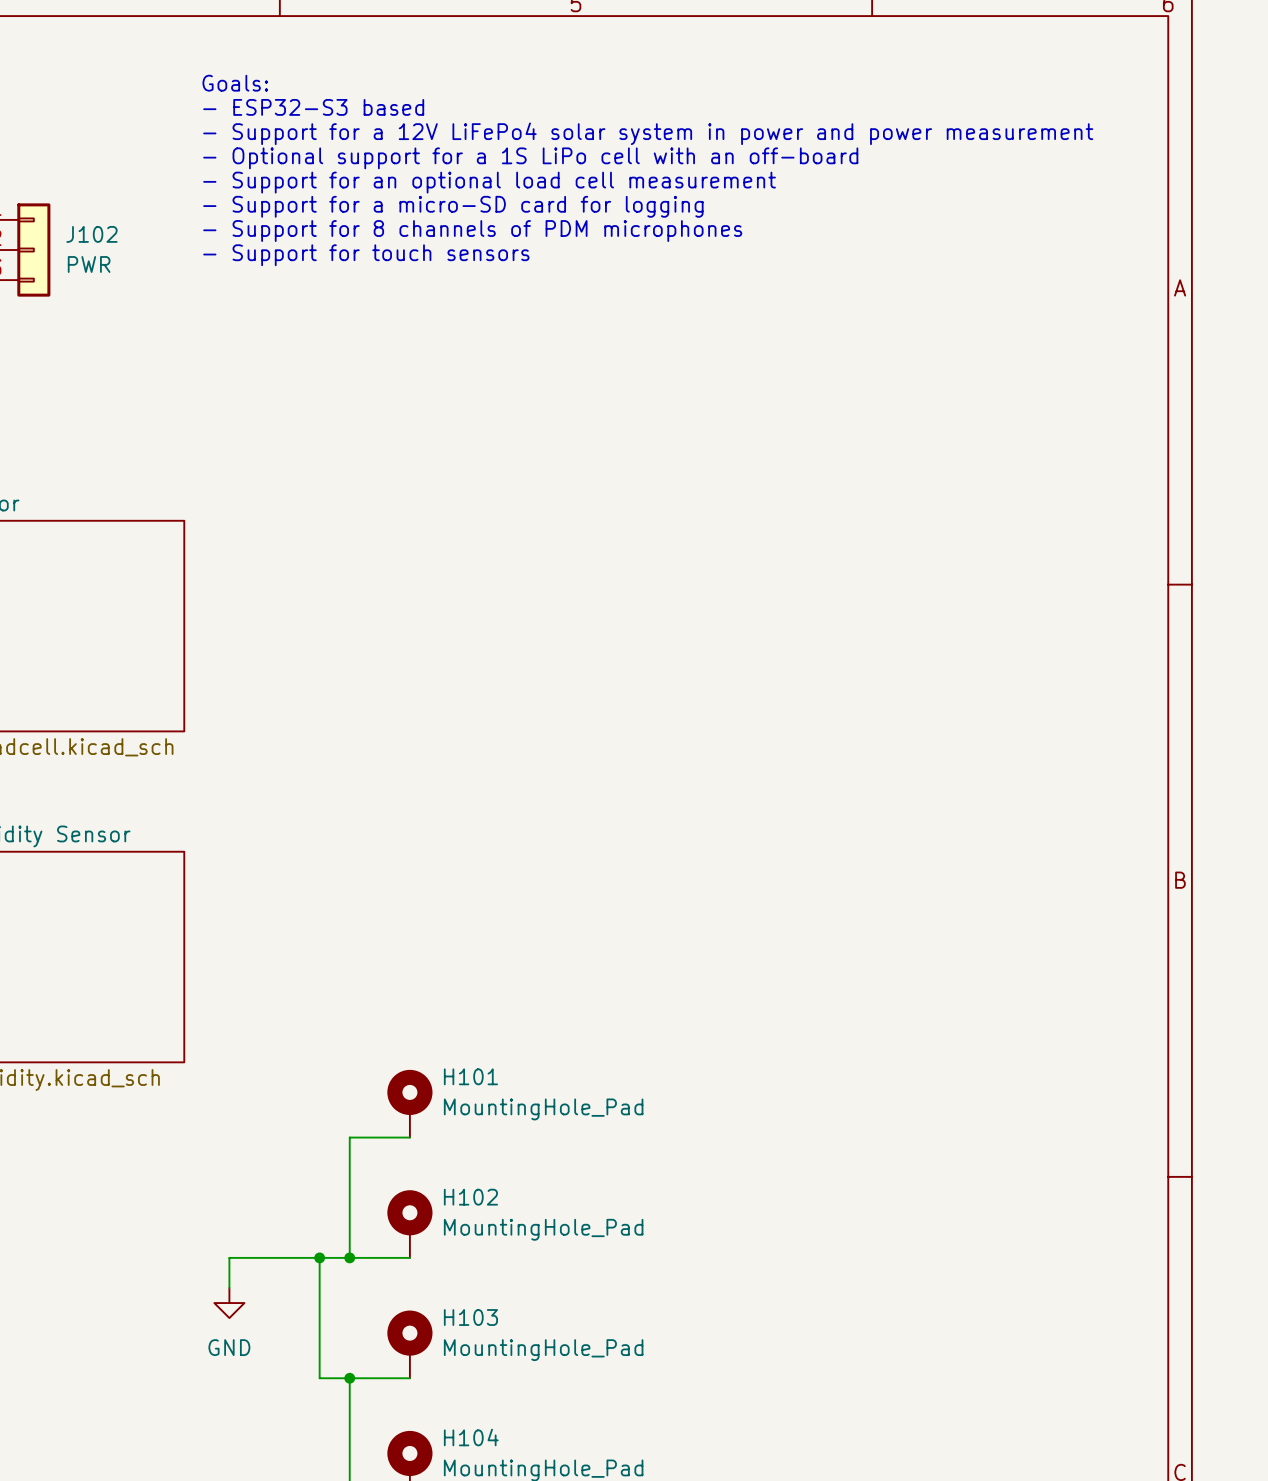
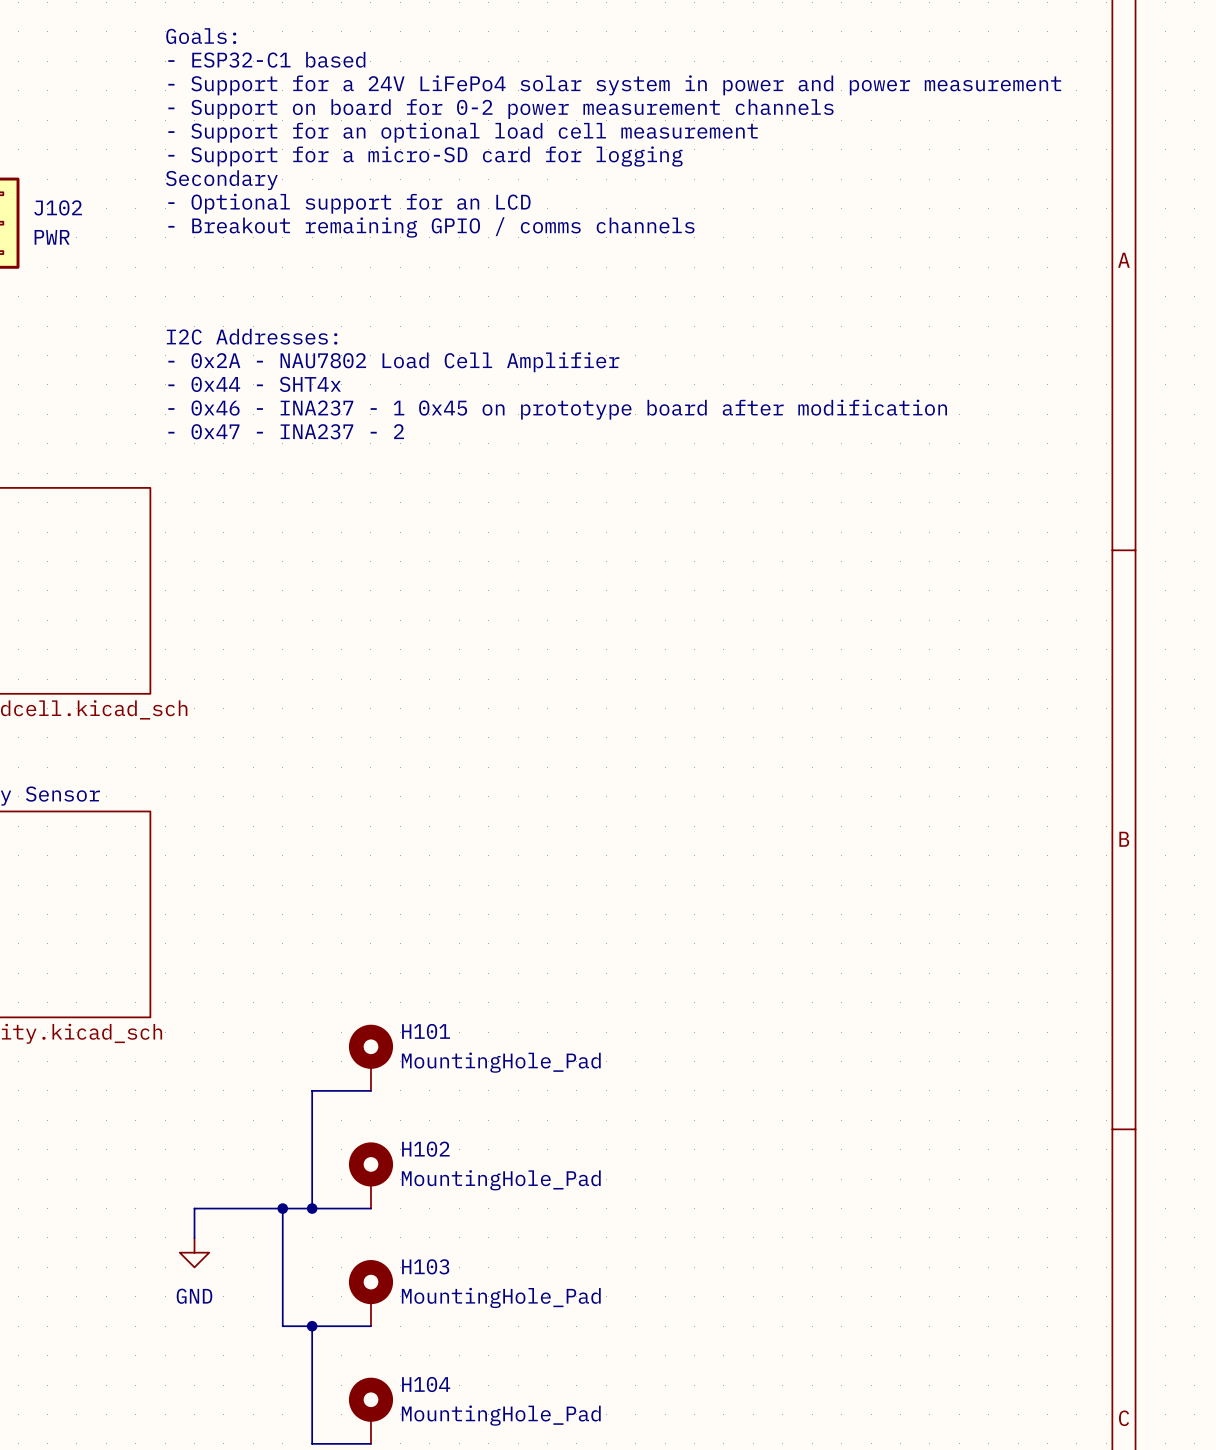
text: none -> Goals: (201, 36)
text: Goals: (235, 83) -> - ESP32-C1 based (266, 59)
text: - ESP32-S3 based (313, 107) -> - Support for a 24V LiFePo4 solar system in power and power measurement (614, 85)
text: - Support for a 12V LiFePo4 solar system in power and power measurement (648, 133) -> - Support on board for 0-2 power measurement channels (500, 109)
text: - Optional support for a 1S LiPo cell with an off-board (530, 158) -> - Support for an optional load cell measurement (463, 132)
text: - Support for an optional load cell measurement (489, 182) -> - Support for a micro-SD card for logging (425, 156)
text: - Support for a micro-SD card for logging (453, 206) -> Secondary (221, 180)
text: - Support for 8 channels of PDM microphones (472, 231) -> - Optional support for an LCD (349, 203)
text: - Support for touch sensors (366, 255) -> - Breakout remaining GPIO / comms channels (431, 227)
text: none -> I2C Addresses: (252, 336)
text: none -> - 0x2A - NAU7802 Load Cell Amplifier (393, 362)
text: none -> - 0x44 - SHT4x (254, 384)
text: none -> - 0x46 - INA237 - 1 0x45 on prototype board after modification (557, 409)
text: none -> - 0x47 - INA237 - 2 (286, 431)

